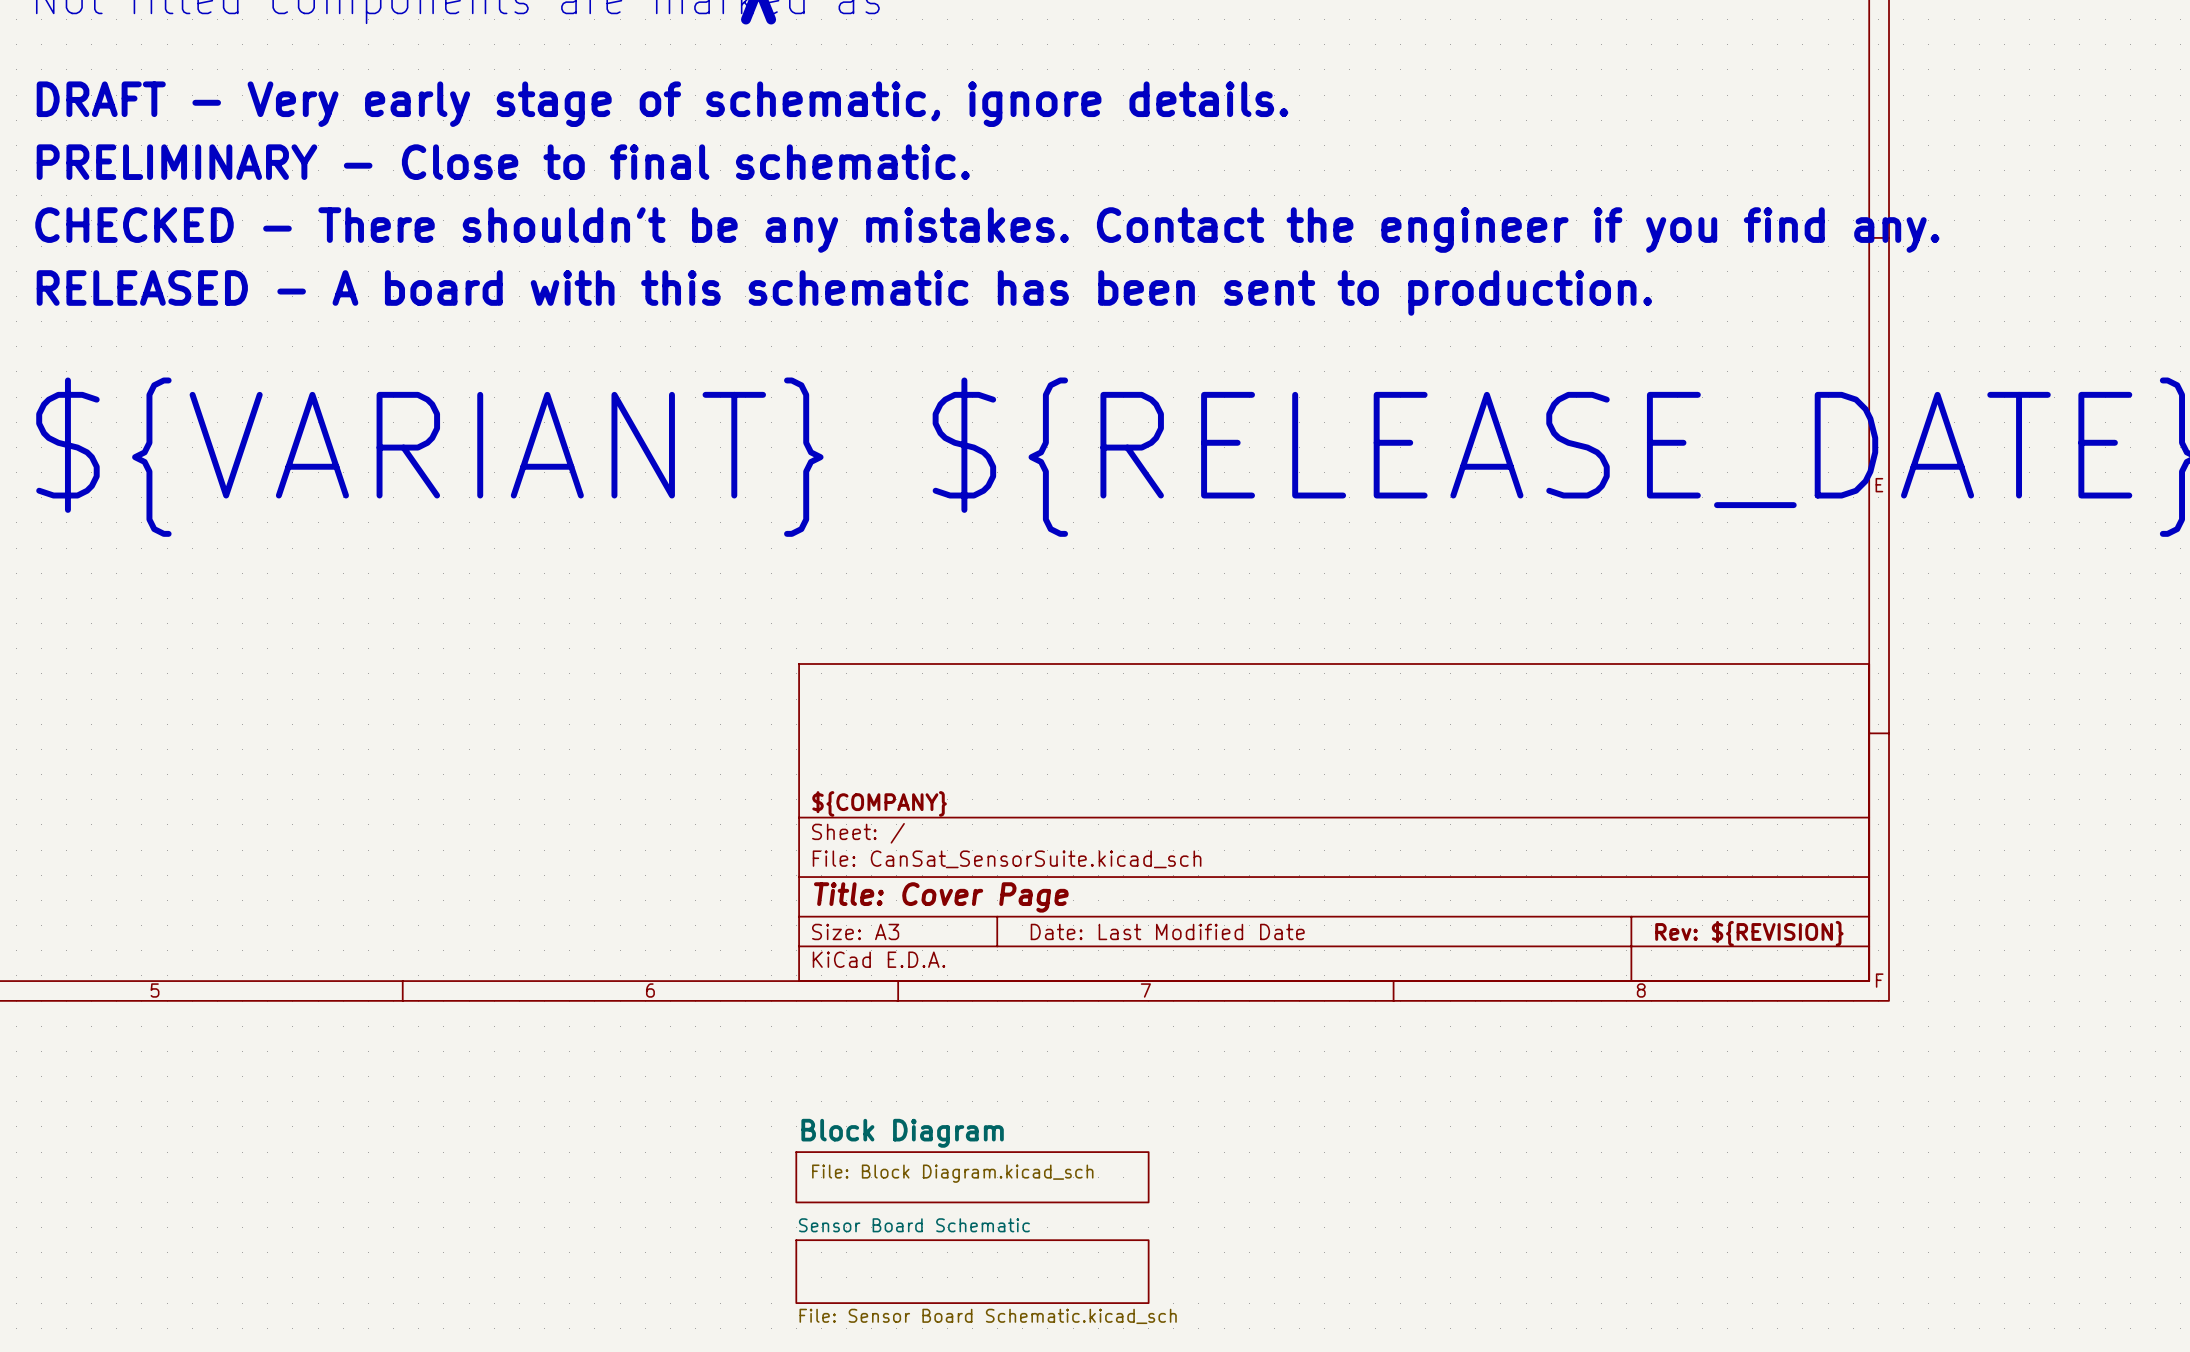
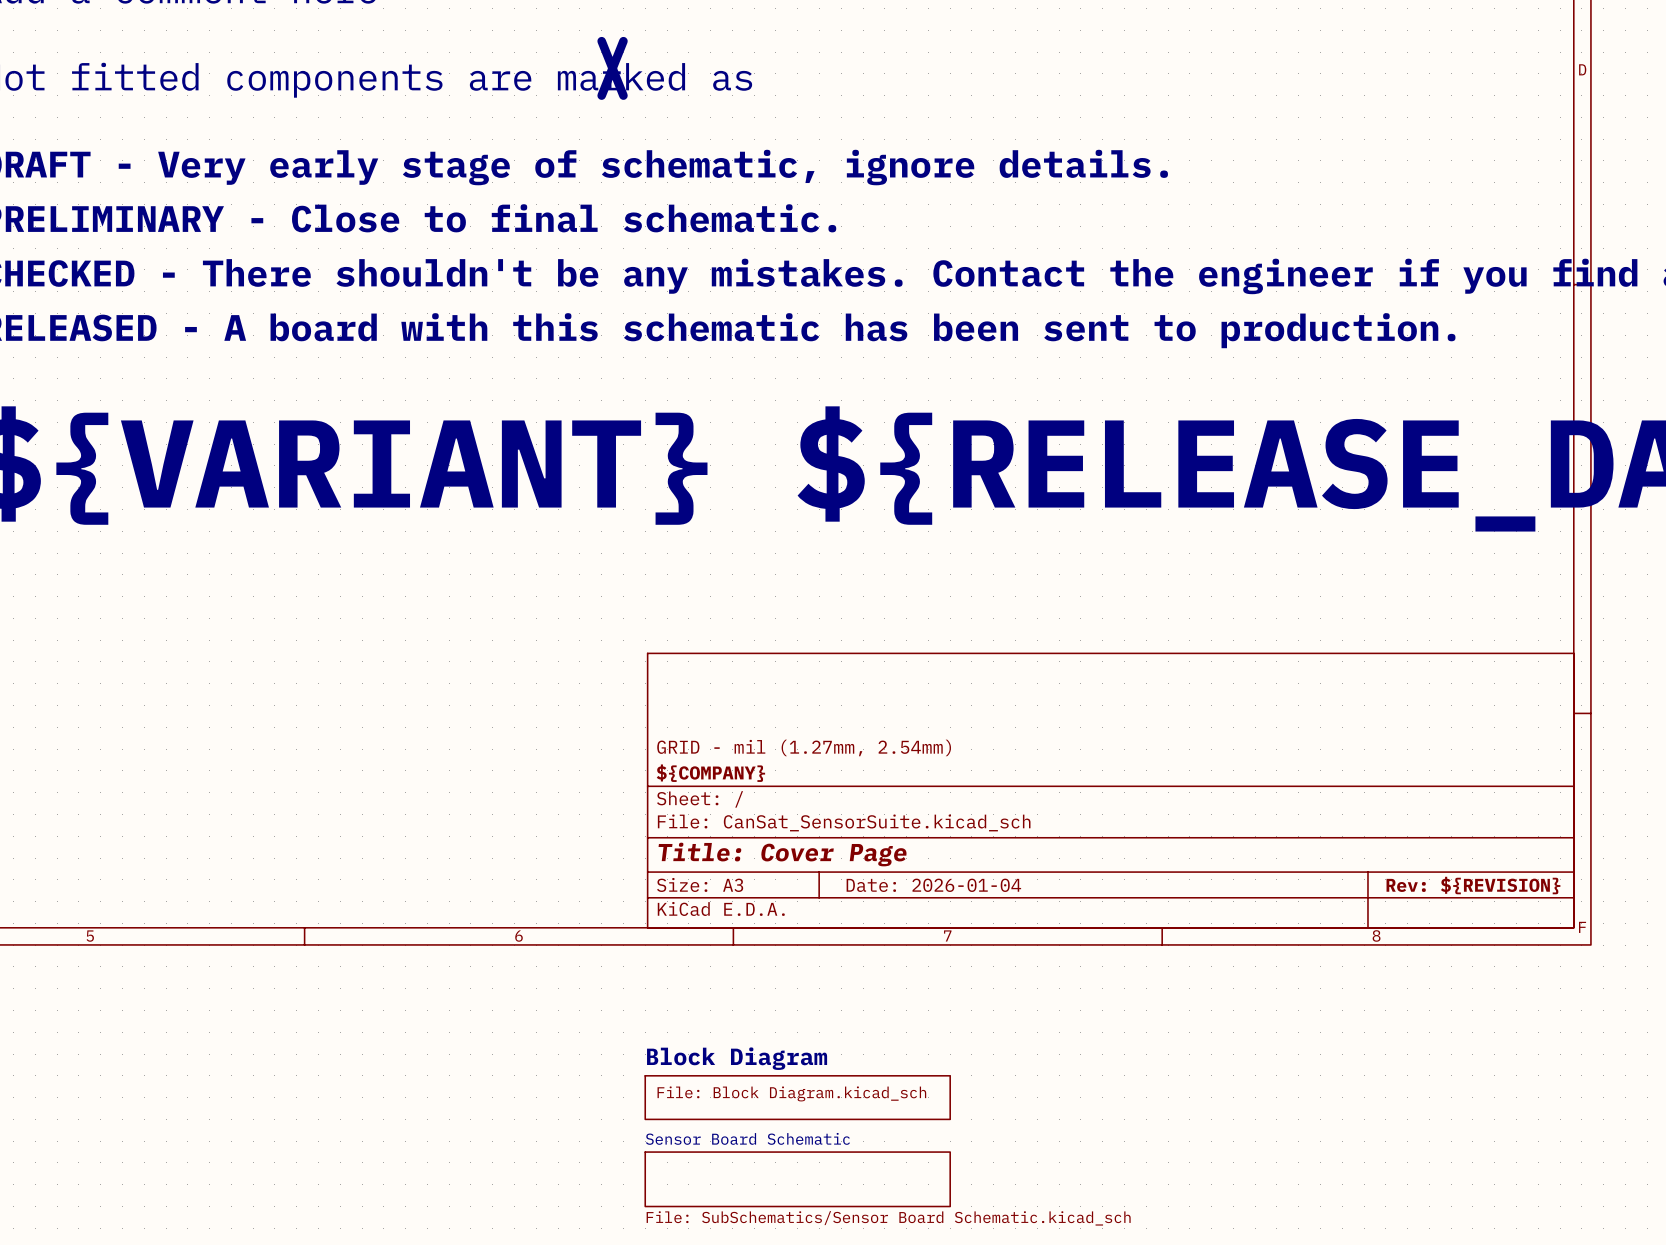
title block: none -> GRID - mil (1.27mm, 2.54mm) (804, 747)
title block: Date: Last Modified Date (1167, 931) -> Date: 2026-01-04 (933, 885)
sheet Sensor Board Schematic value: File: Sensor Board Schematic.kicad_sch (988, 1316) -> File: SubSchematics/Sensor Board Schematic.kicad_sch (888, 1218)

